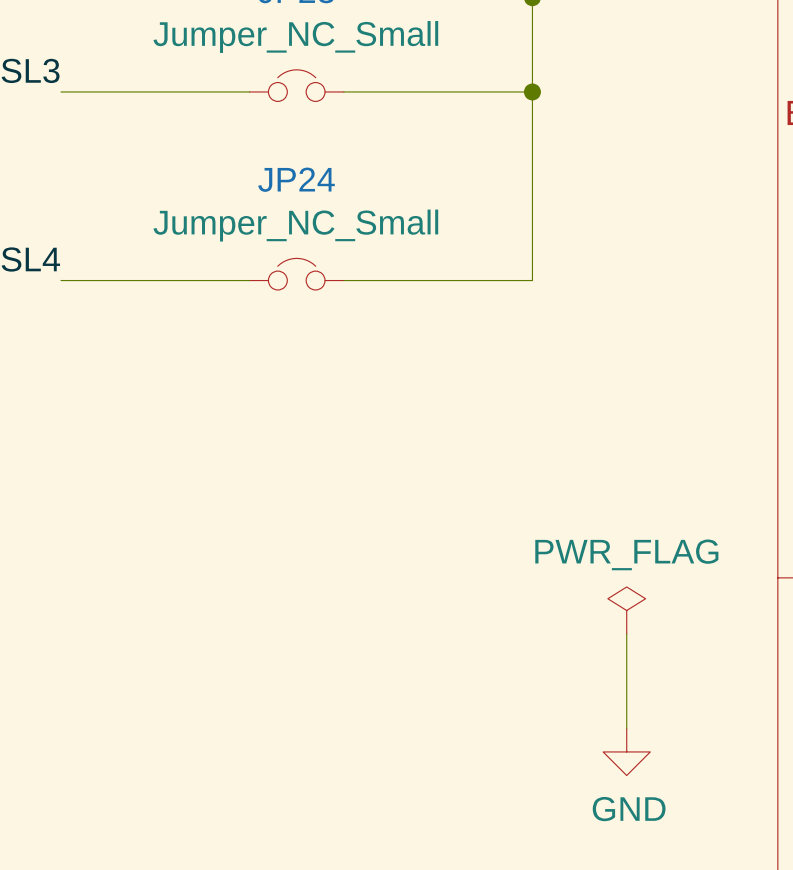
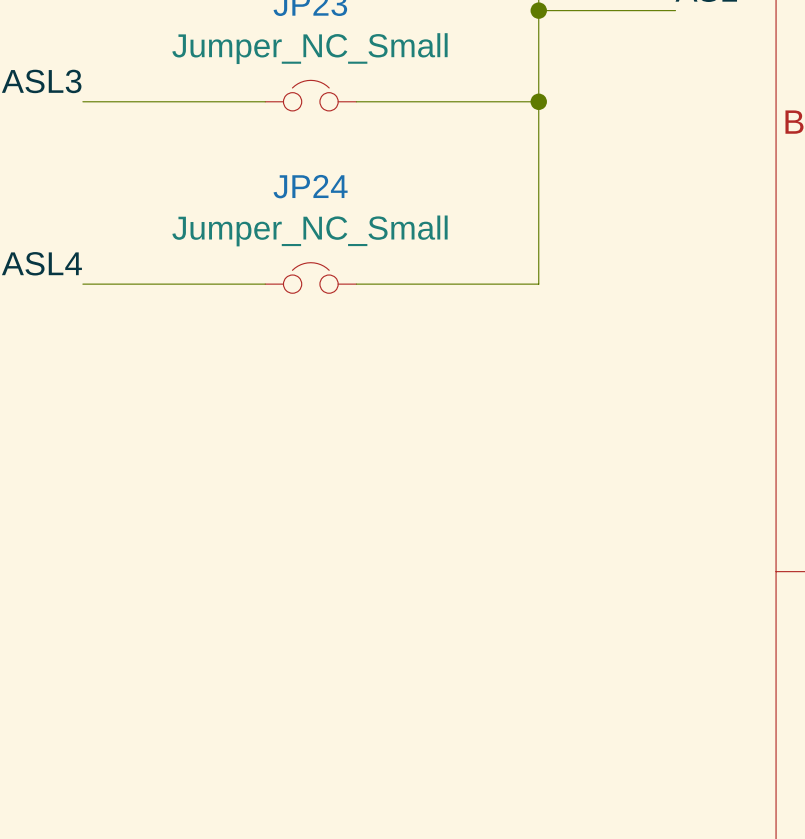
power symbol: PWR_FLAG (626, 610) -> none
wire: (626, 634) (626, 728) -> none
power symbol: GND (626, 751) -> none

